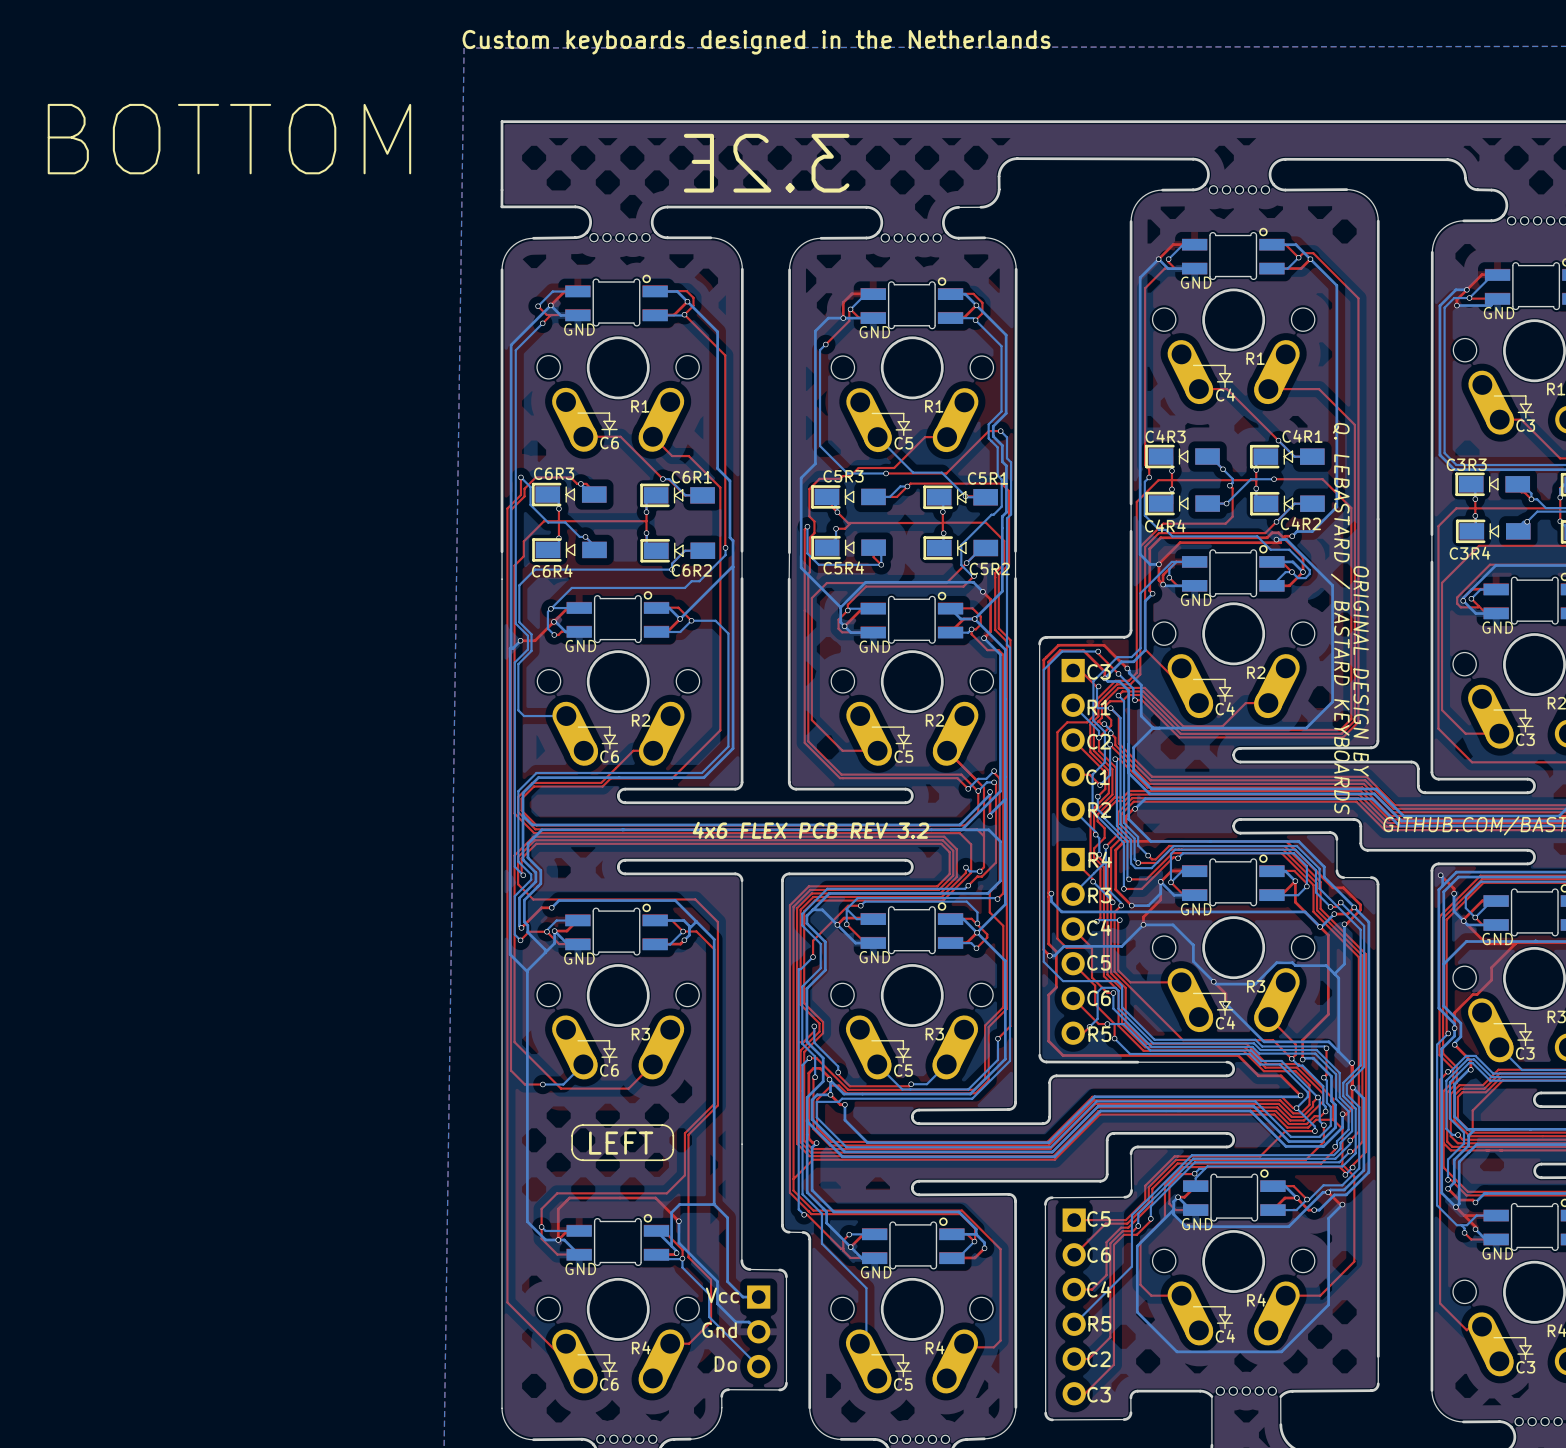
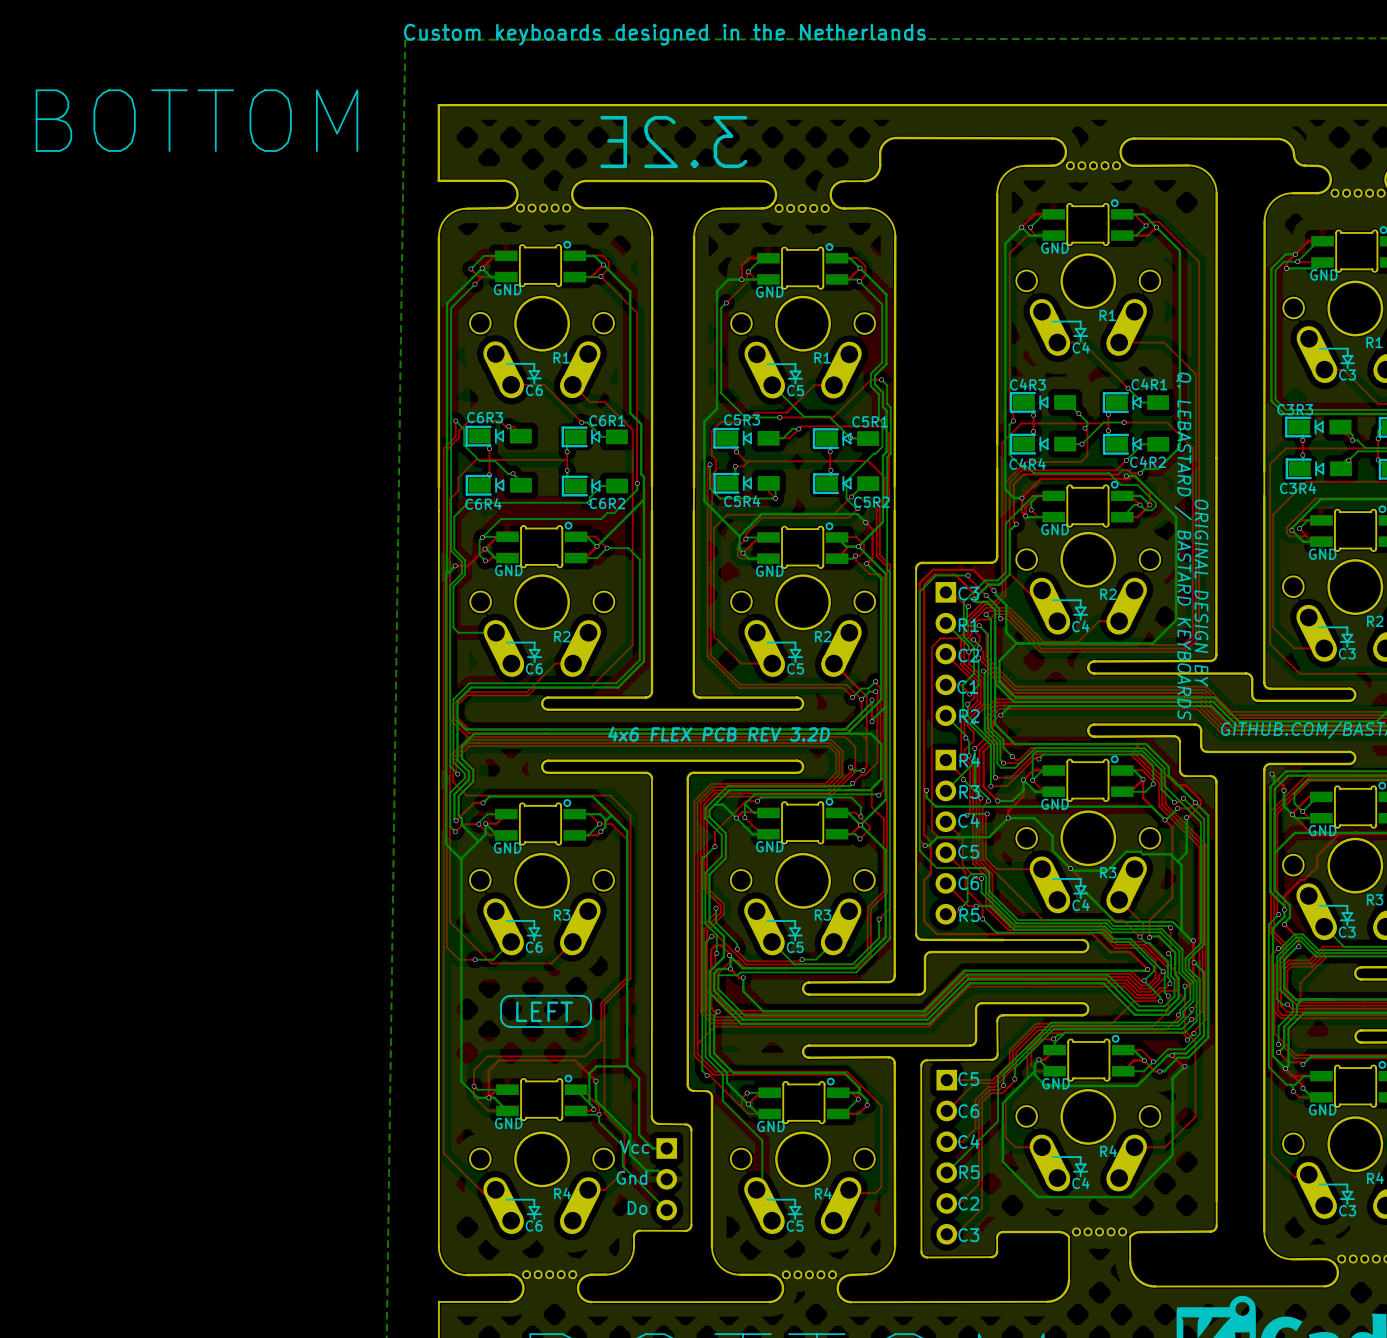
text: 4x6 FLEX PCB REV 3.2 (810, 830) -> 4x6 FLEX PCB REV 3.2D (719, 734)

